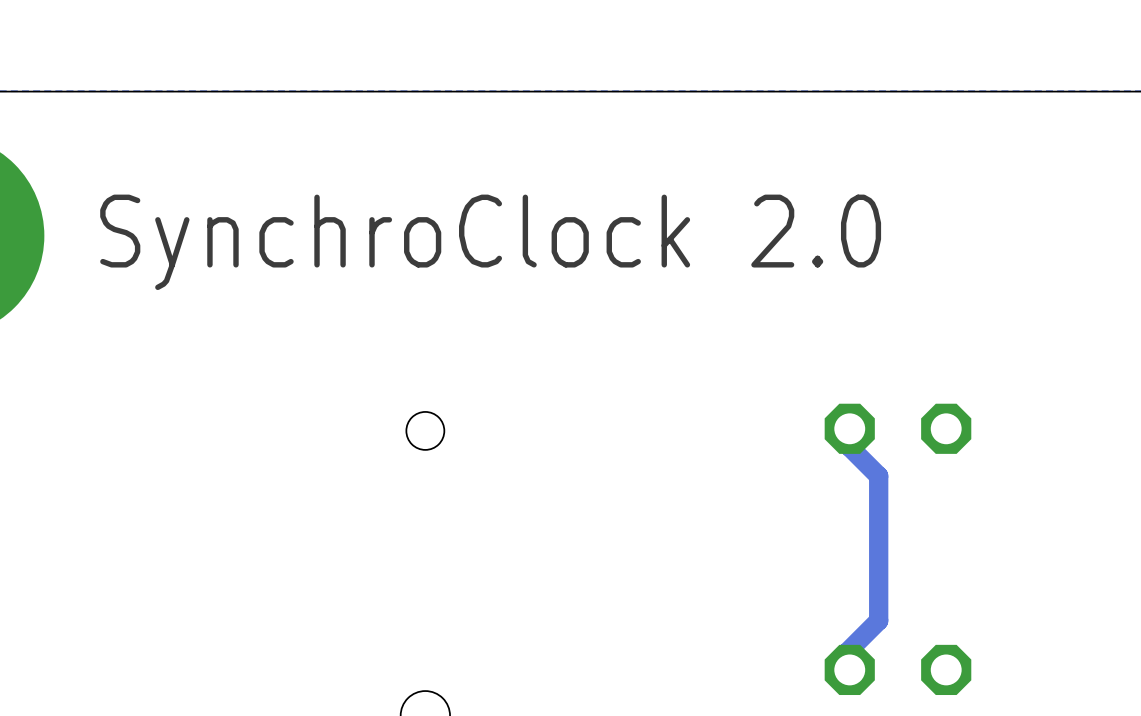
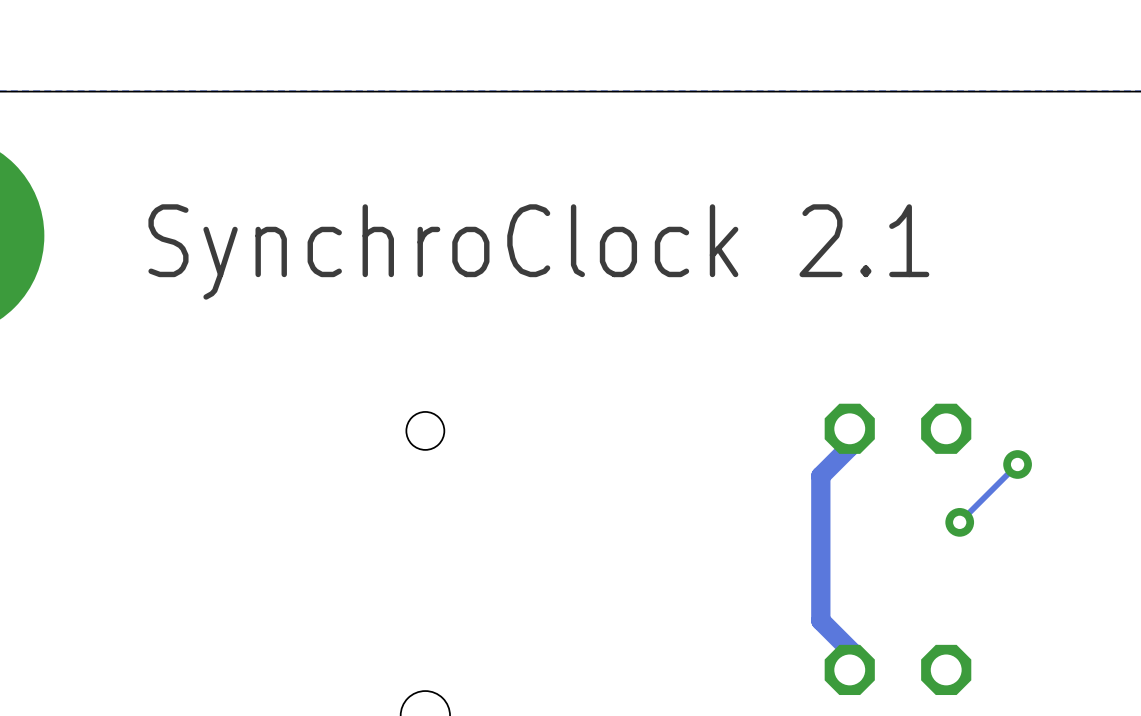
text: SynchroClock 2.0 (490, 242) -> SynchroClock 2.1 (538, 251)
track: (849, 447) (878, 476) (878, 620) (846, 652) (846, 667) (849, 669) -> (849, 447) (820, 476) (820, 620) (852, 652) (852, 667) (849, 669)
track: none -> (1017, 464) (959, 522)
via: none -> (1017, 464)
via: none -> (959, 522)

